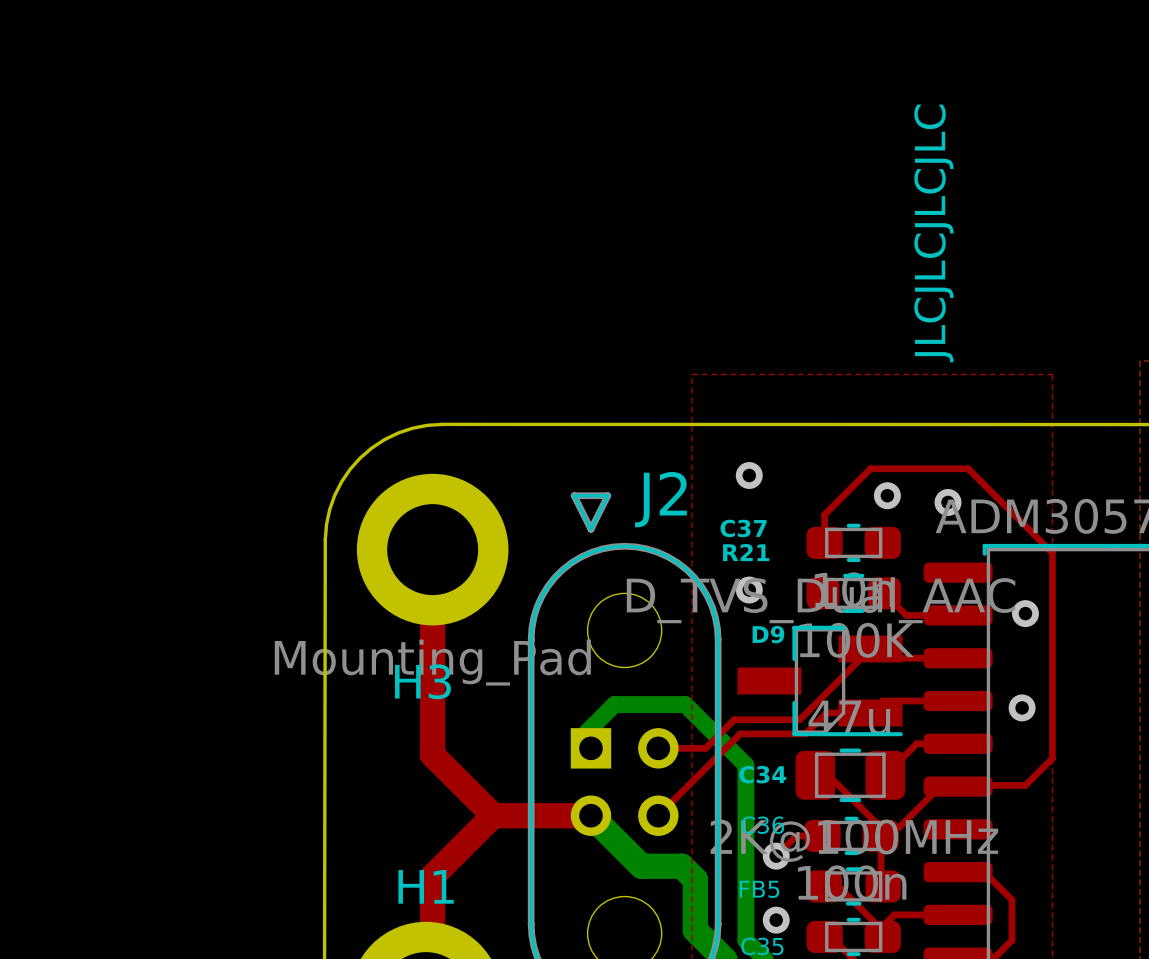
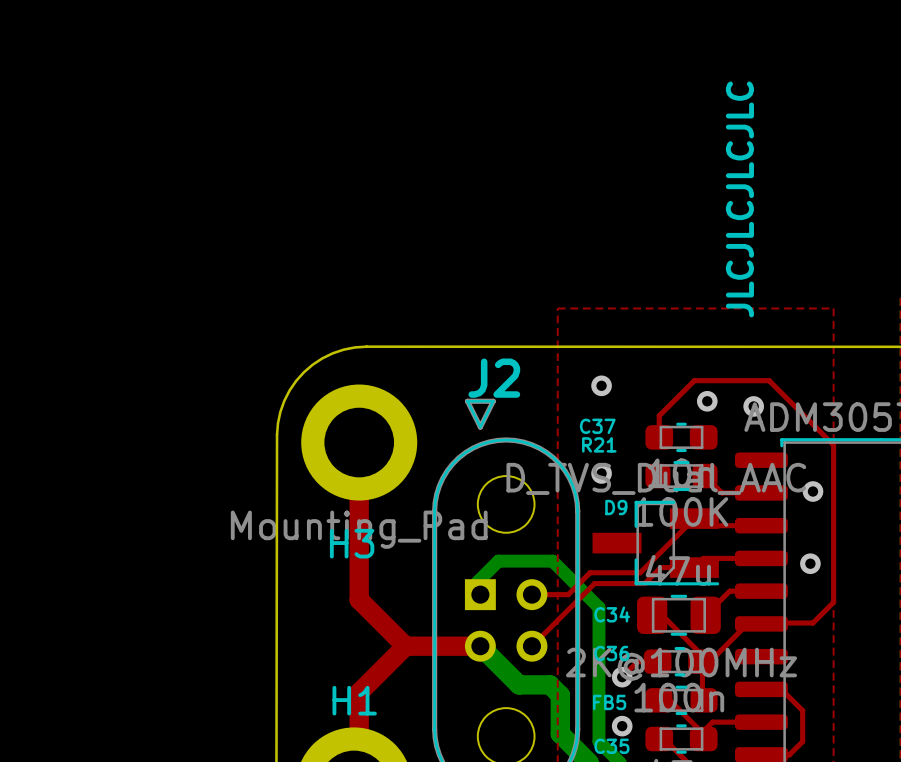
J2 name position: J2 (660, 499) -> J2 (494, 378)

